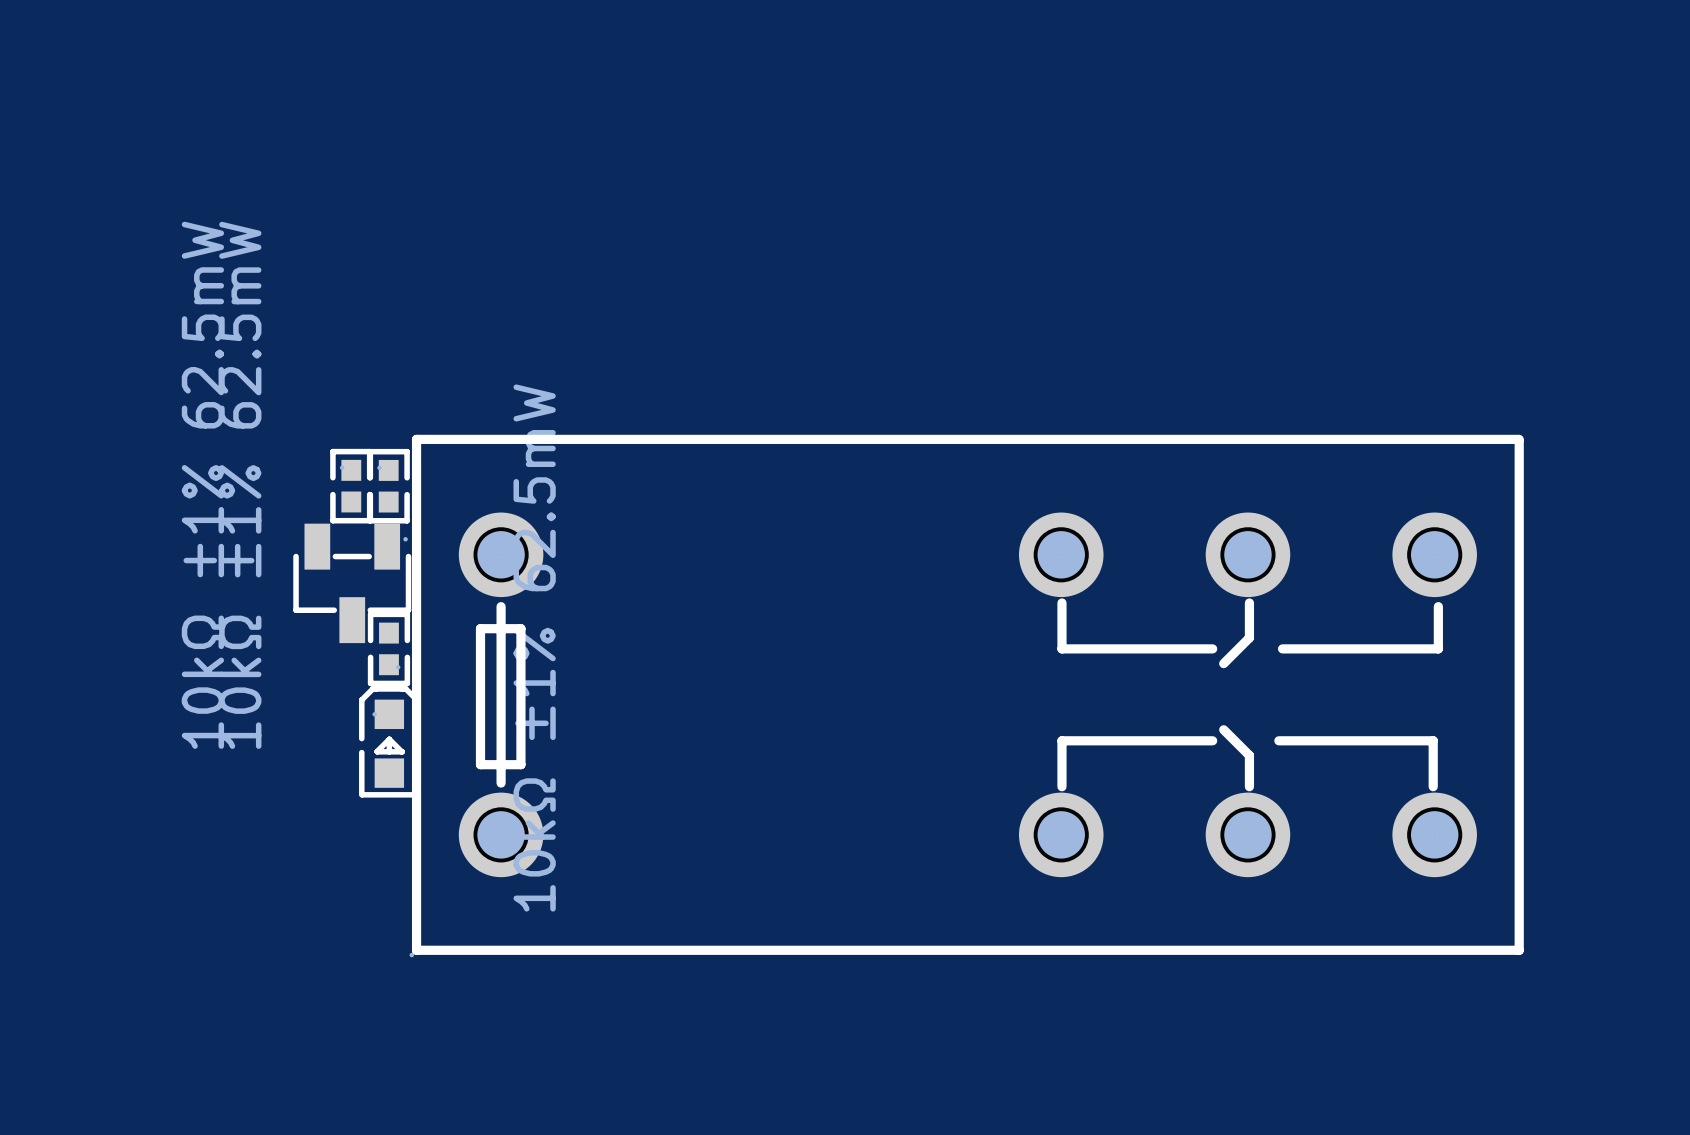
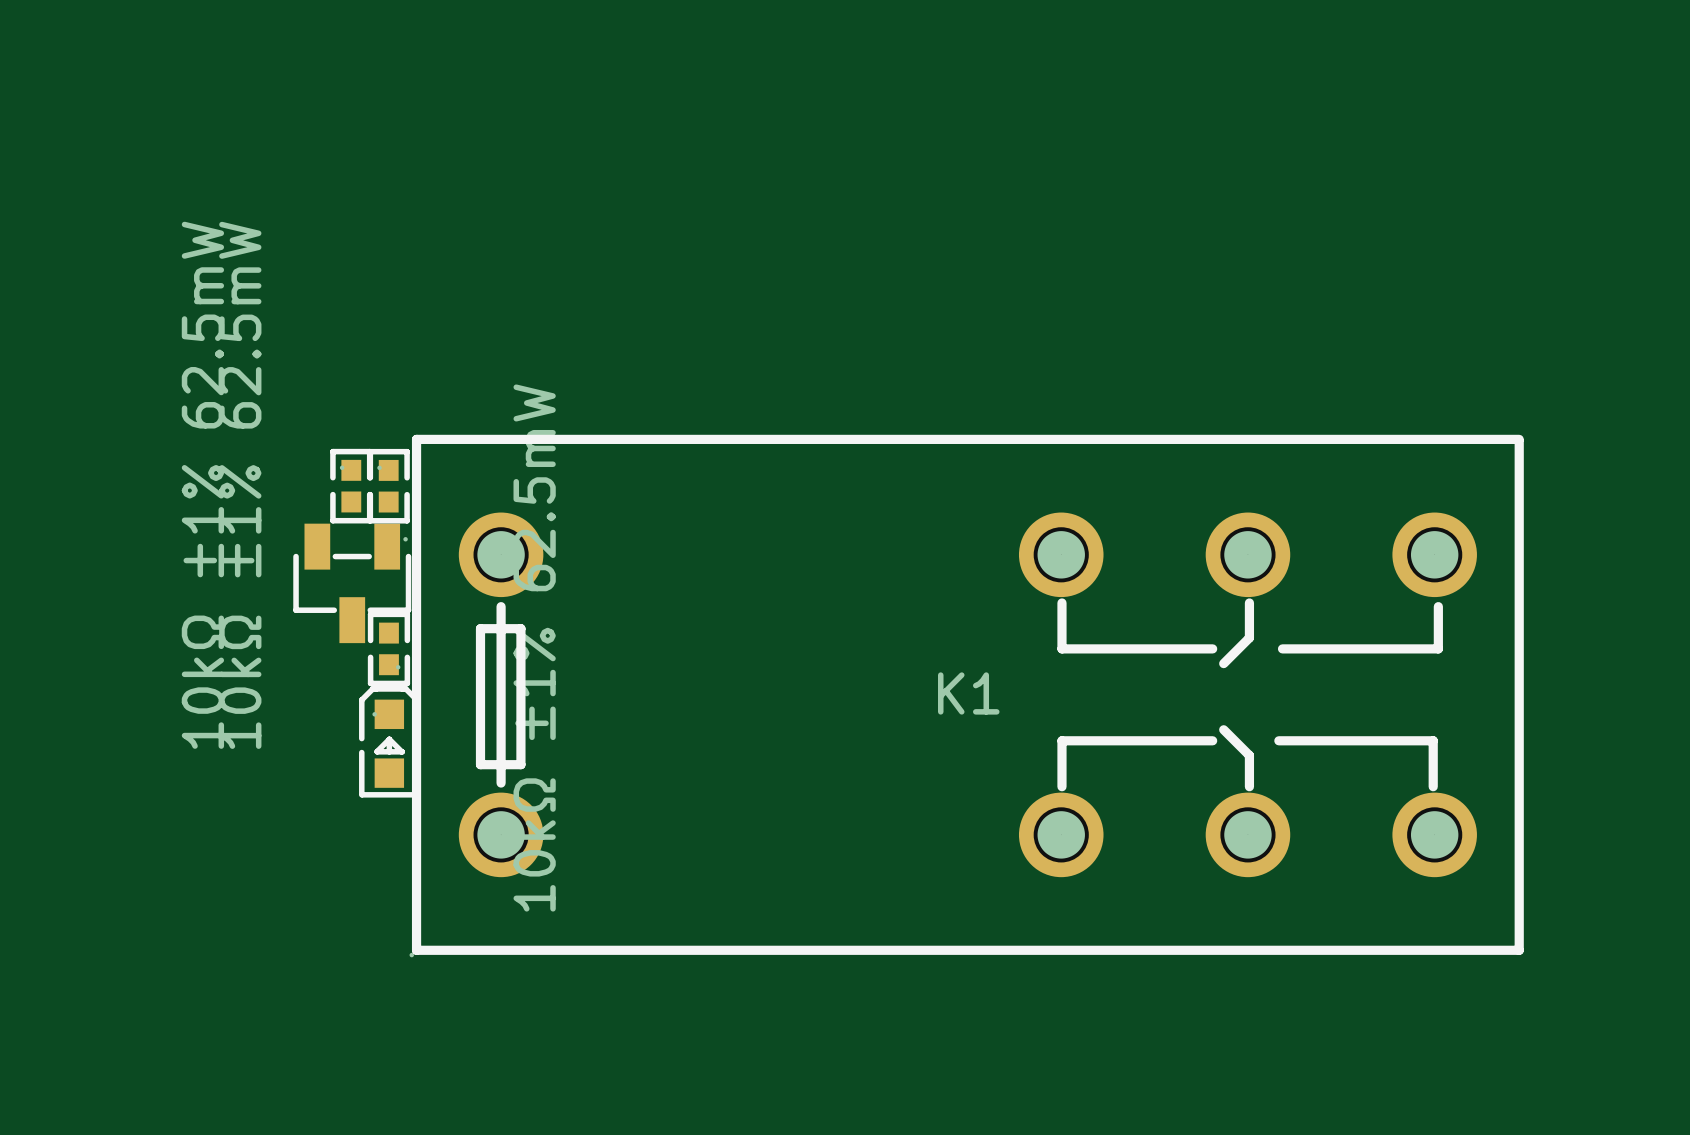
K1 name: none -> K1 (968, 693)

